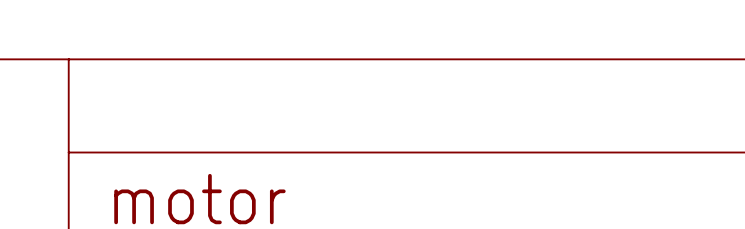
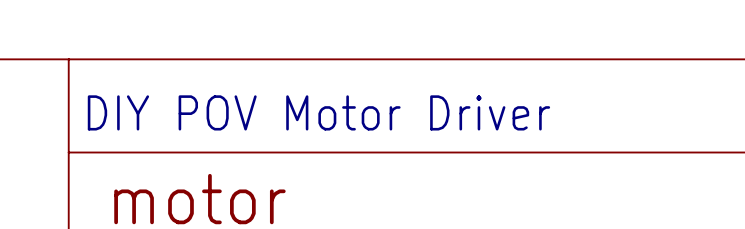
text: none -> DIY POV Motor Driver (318, 112)

